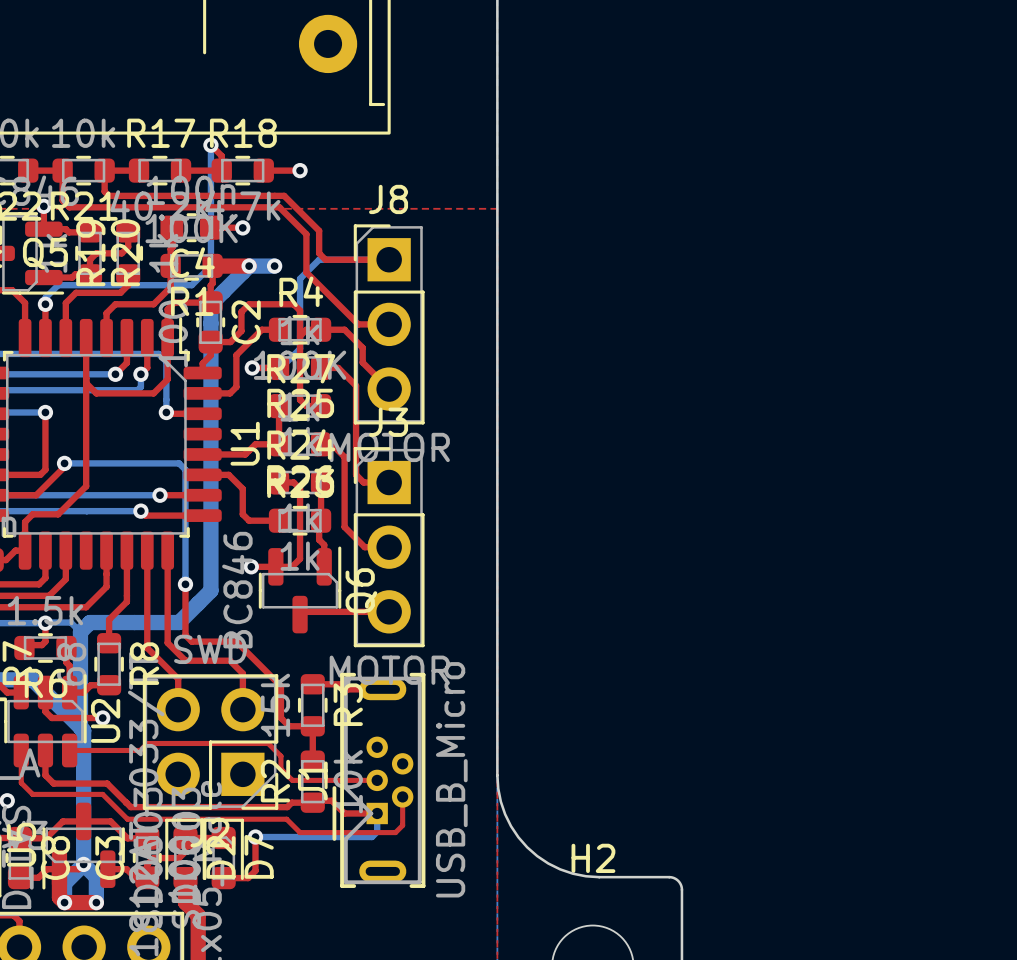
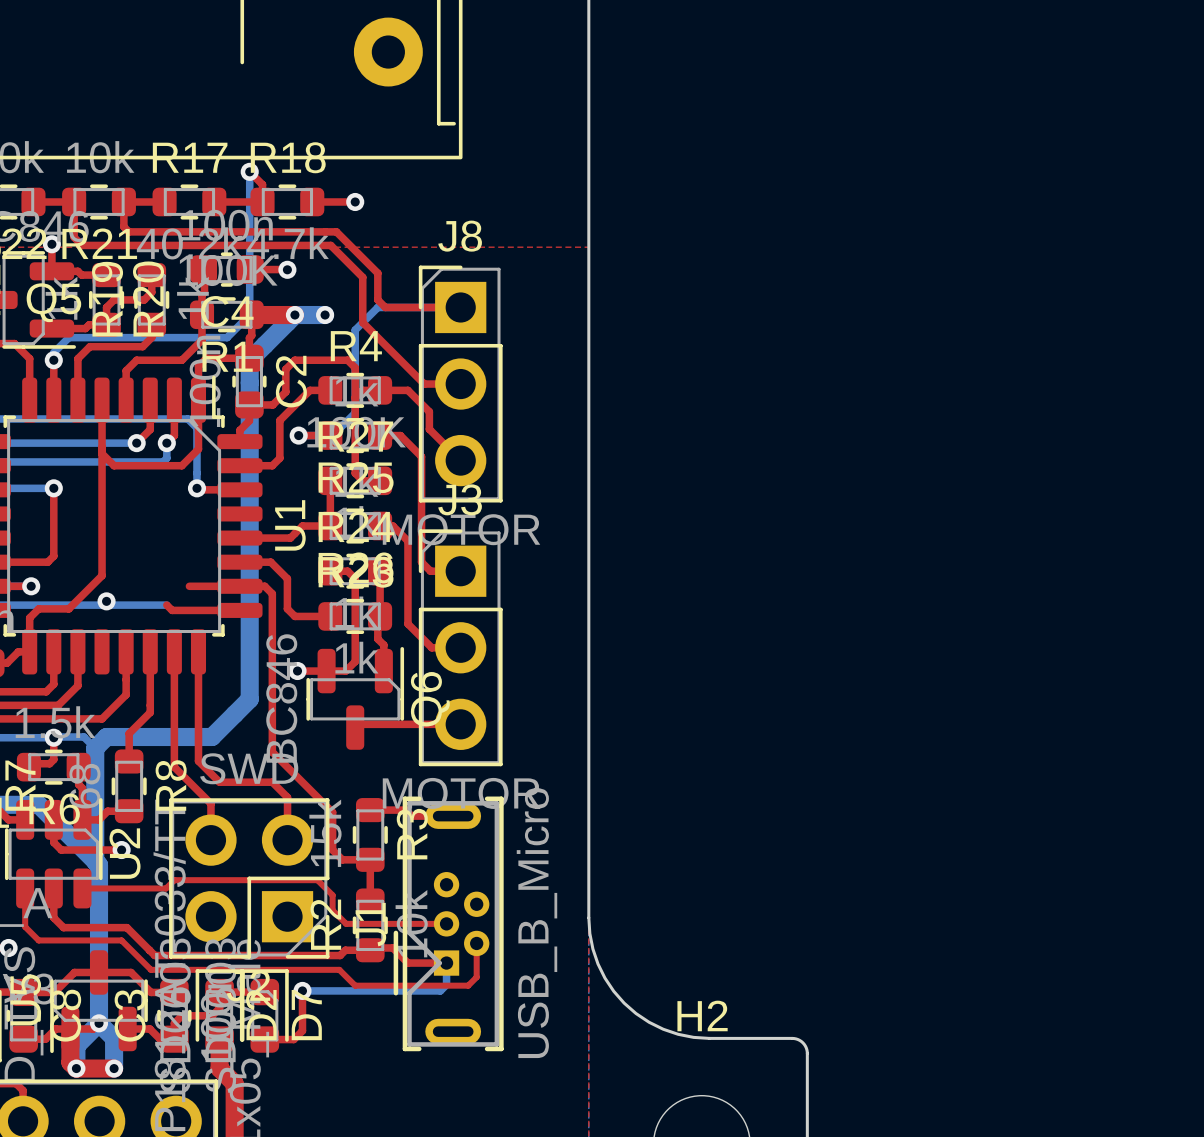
top track: (64, 463) (64, 466) (36, 495) (26, 495) -> none
bottom track: (64, 463) (179, 463) (185, 469) (185, 584) -> none
via: (64, 463) -> none
bottom track: (26, 495) (160, 495) -> none
via: none -> (31, 586)
via: (160, 495) -> none
via: none -> (106, 601)
via: (140, 511) -> none
top track: (185, 584) (185, 635) (191, 641) (236, 641) -> (239, 586) (264, 586) (272, 593) (272, 752) (279, 759)
via: (185, 584) -> none

